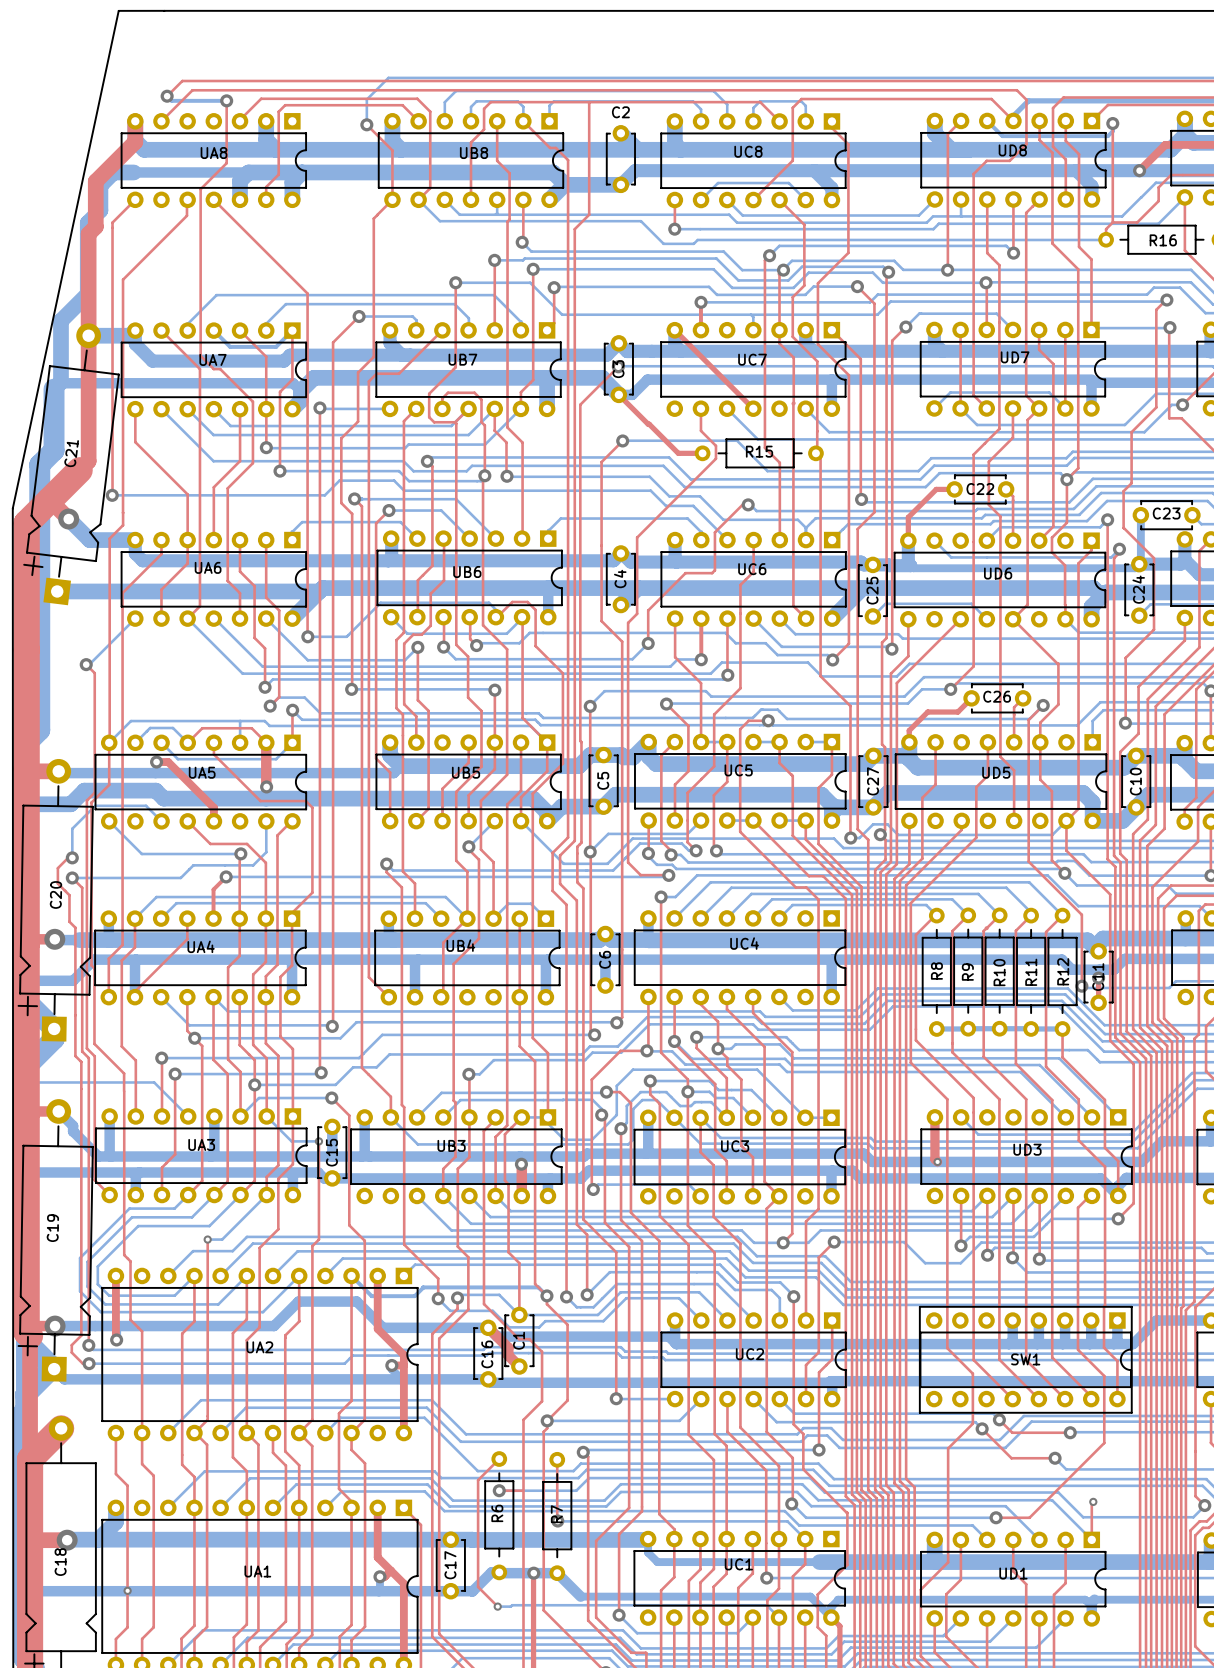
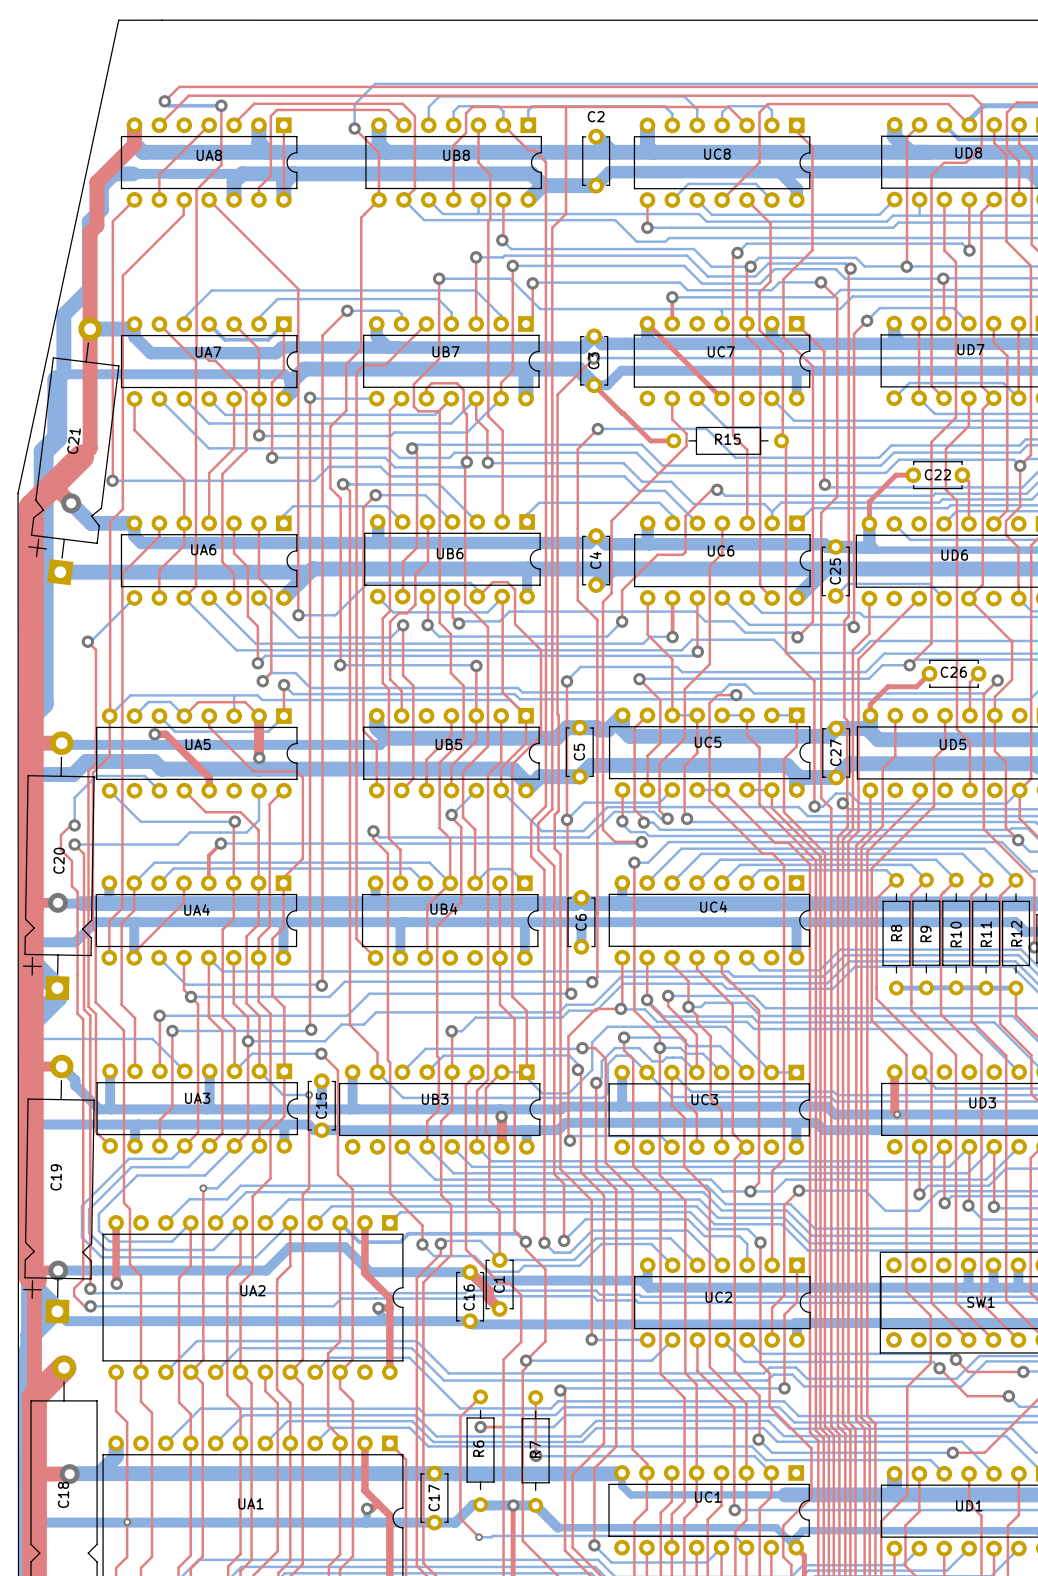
top track: none -> (209, 125) (159, 174) (159, 199)
top track: none -> (283, 125) (283, 199)

